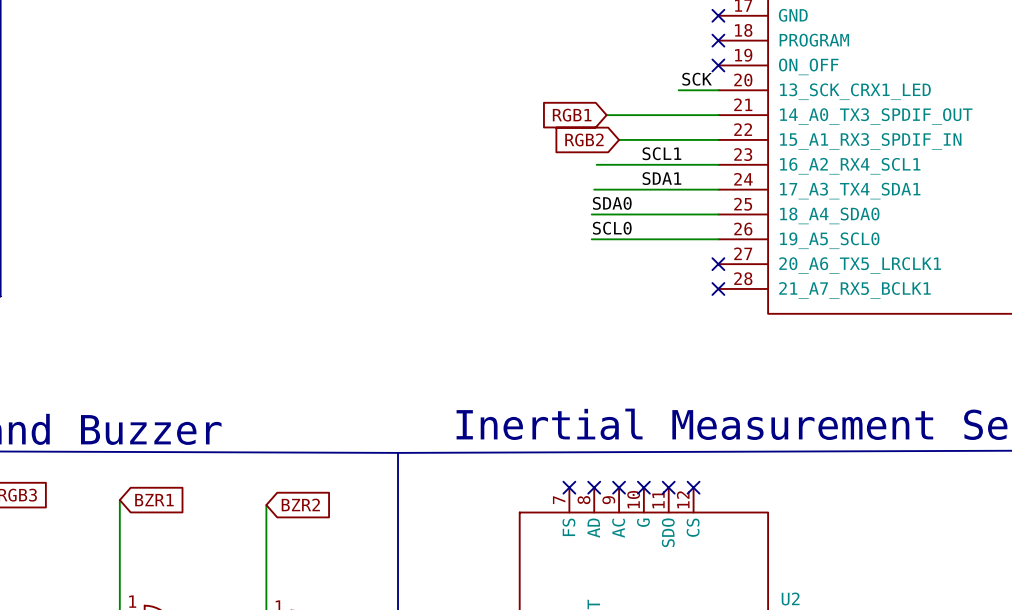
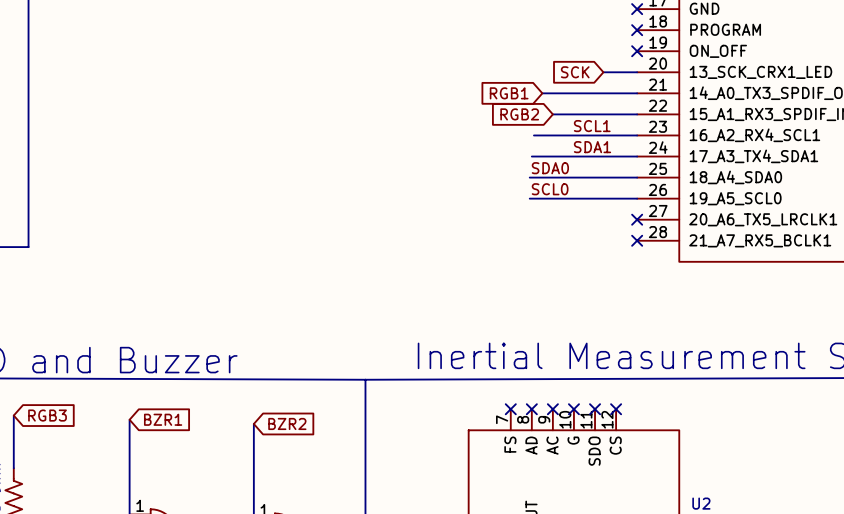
label: SCK (697, 79) -> none
global label: none -> SCK (575, 72)

